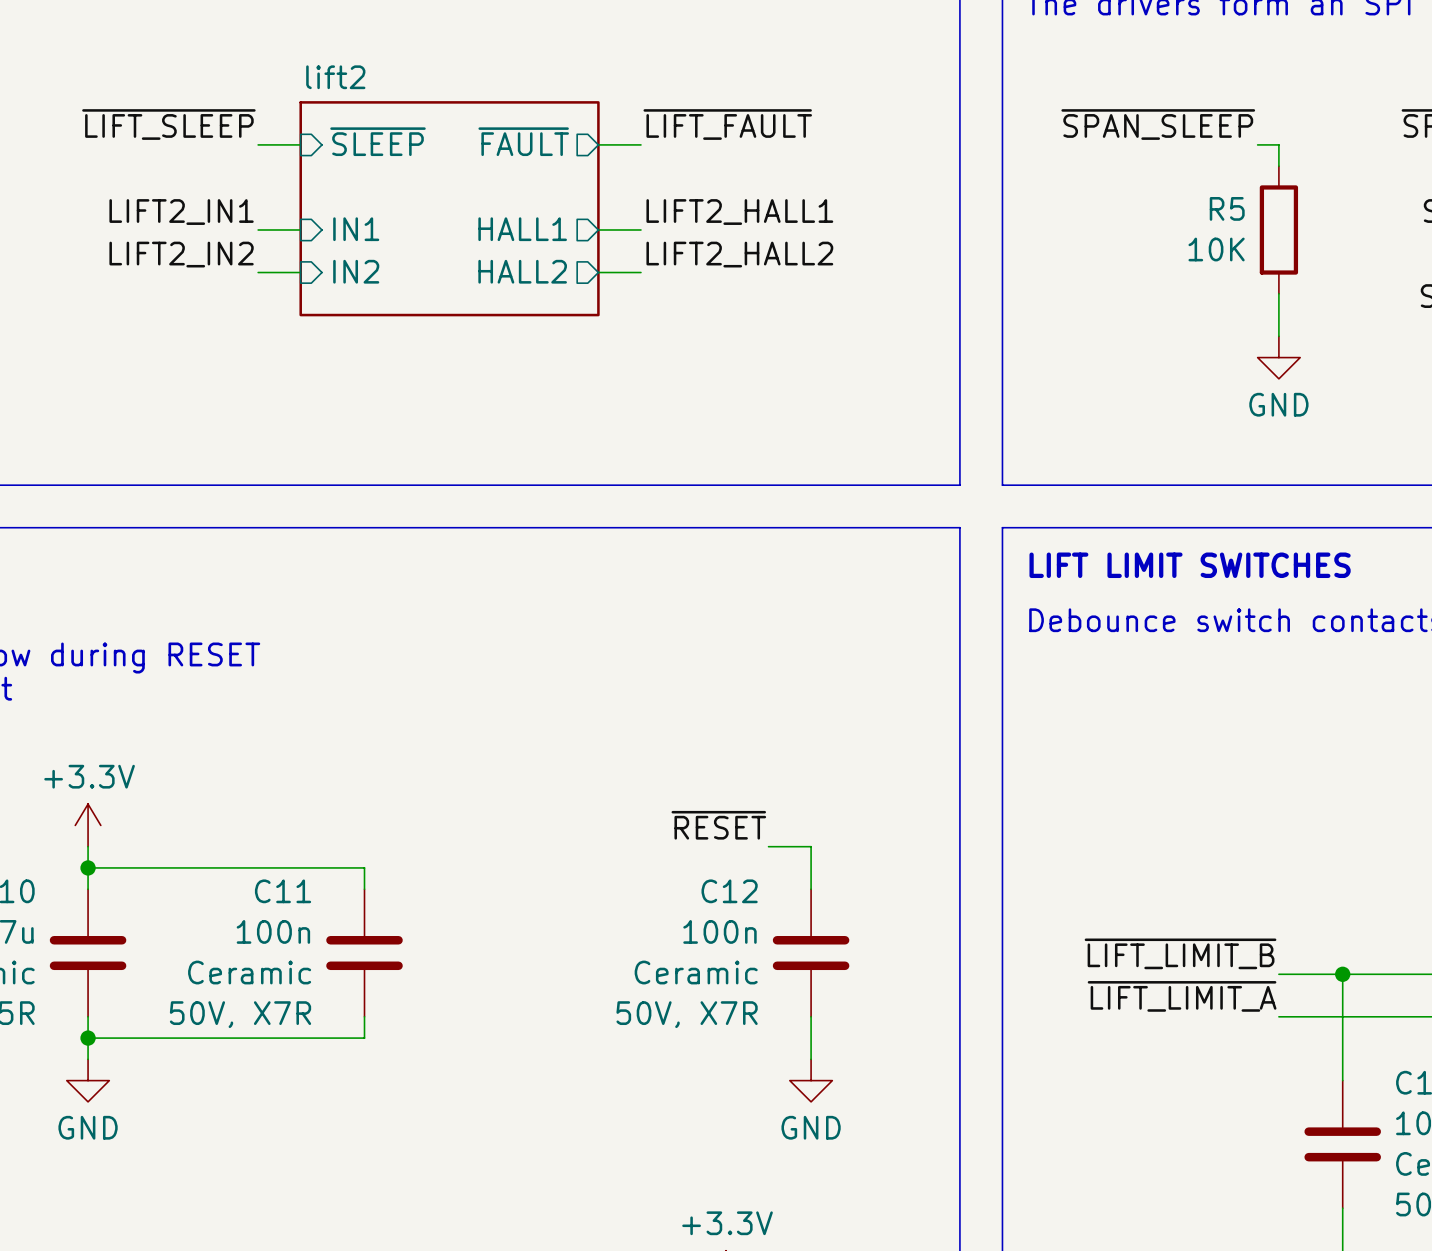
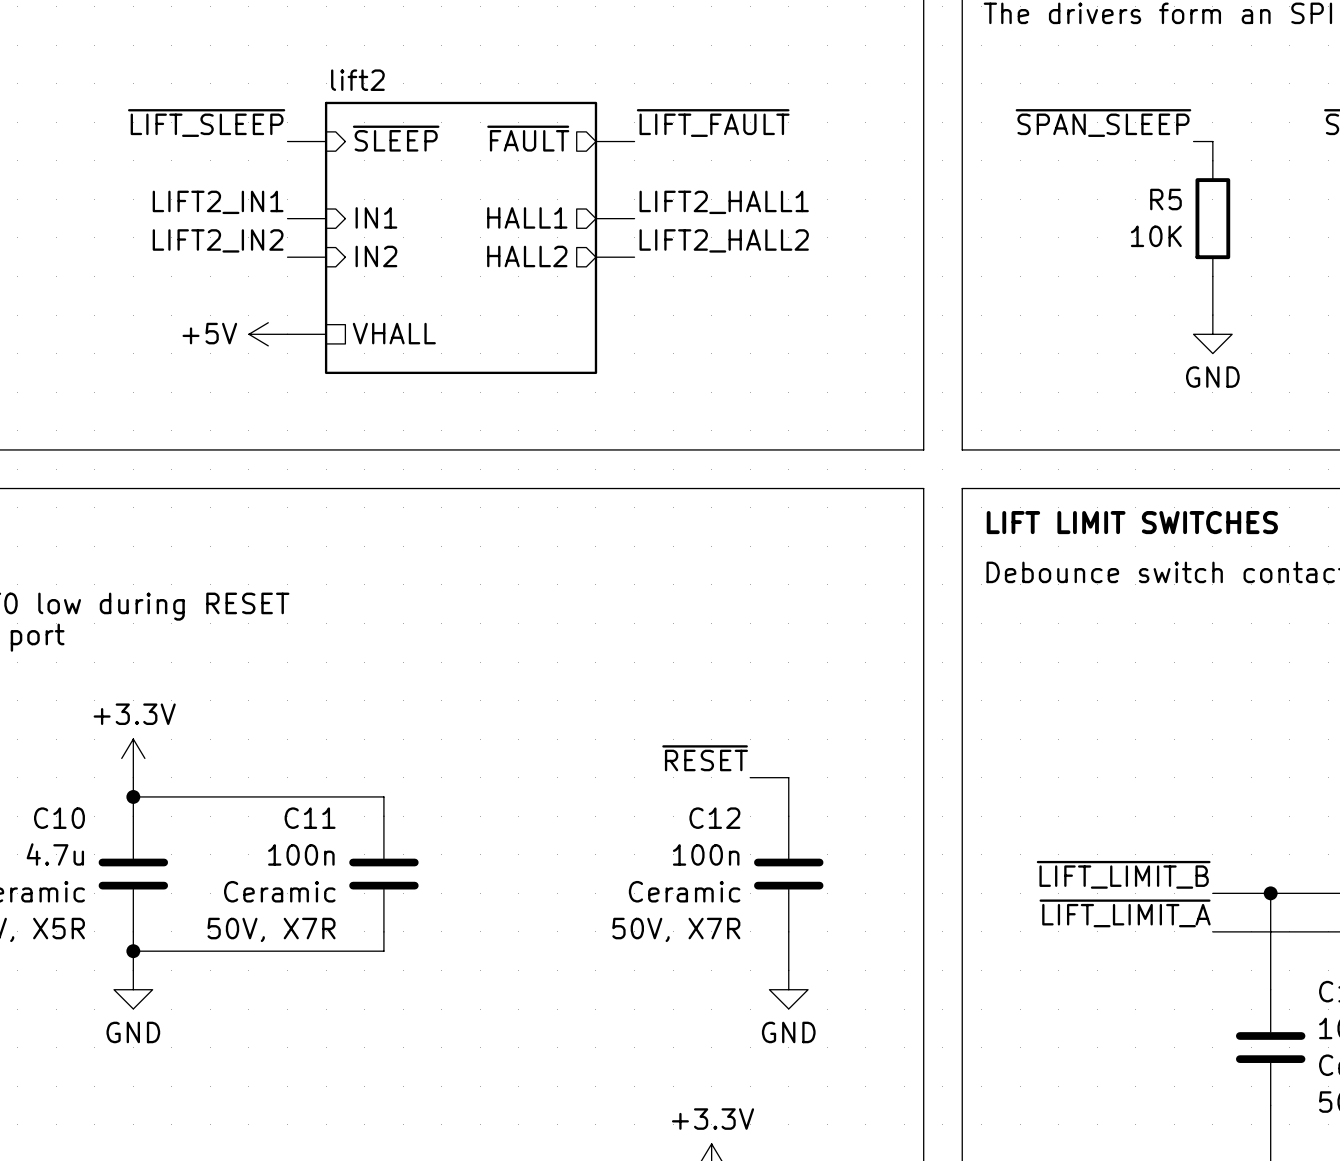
sheet lift2 shape: [299, 101, 600, 317] -> [324, 101, 598, 375]
sheet pin: none -> VHALL (394, 333)
power symbol: none -> +5V (268, 334)
wire: none -> (287, 334) (326, 334)

